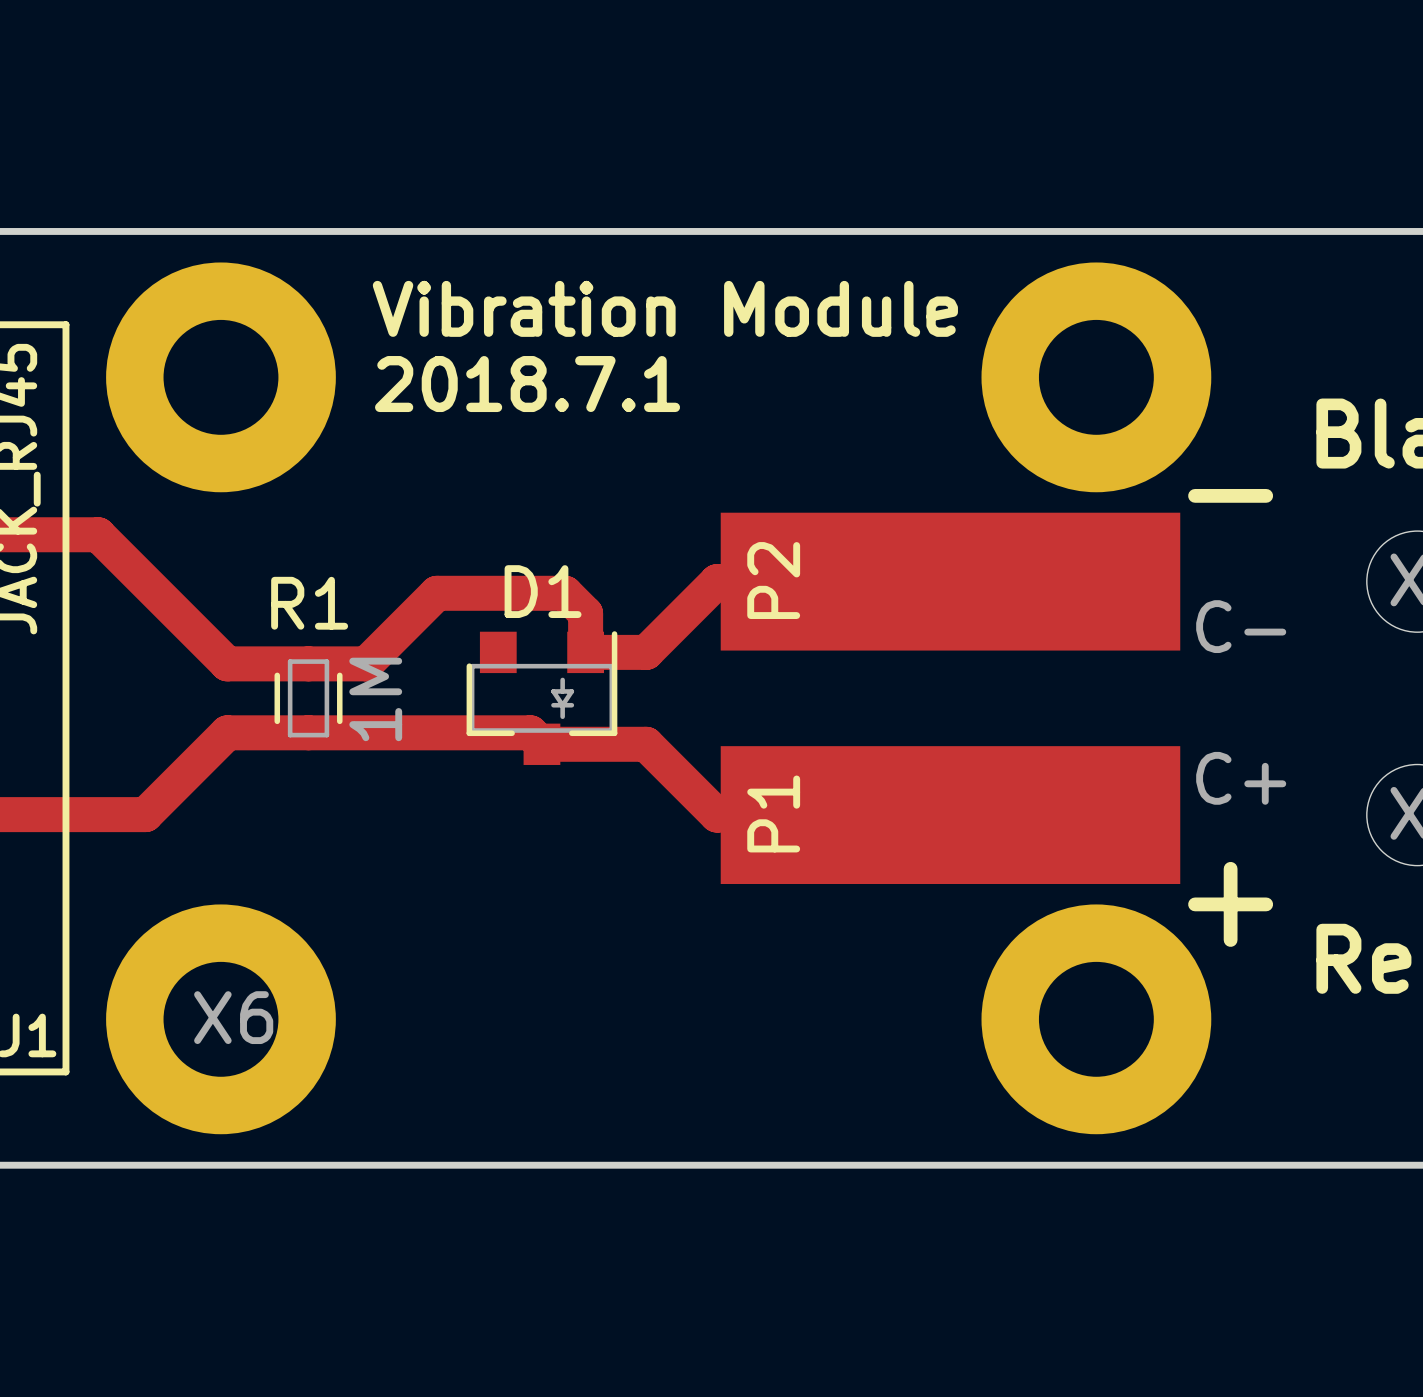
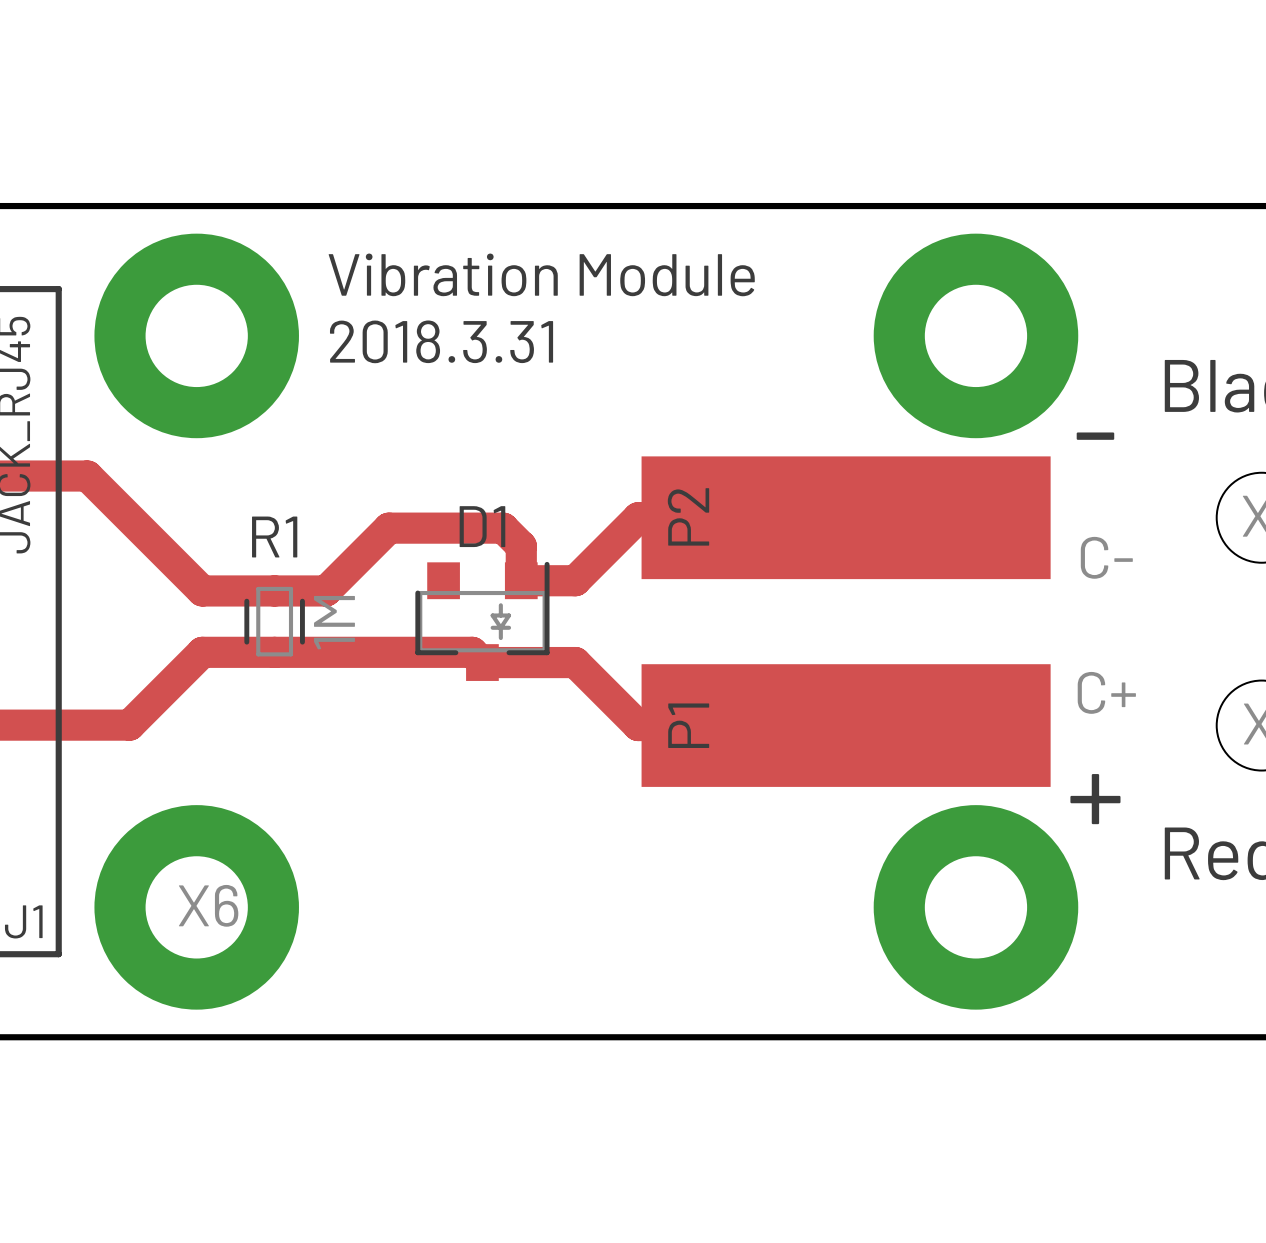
text: 2018.7.1 (527, 384) -> 2018.3.31 (441, 341)

